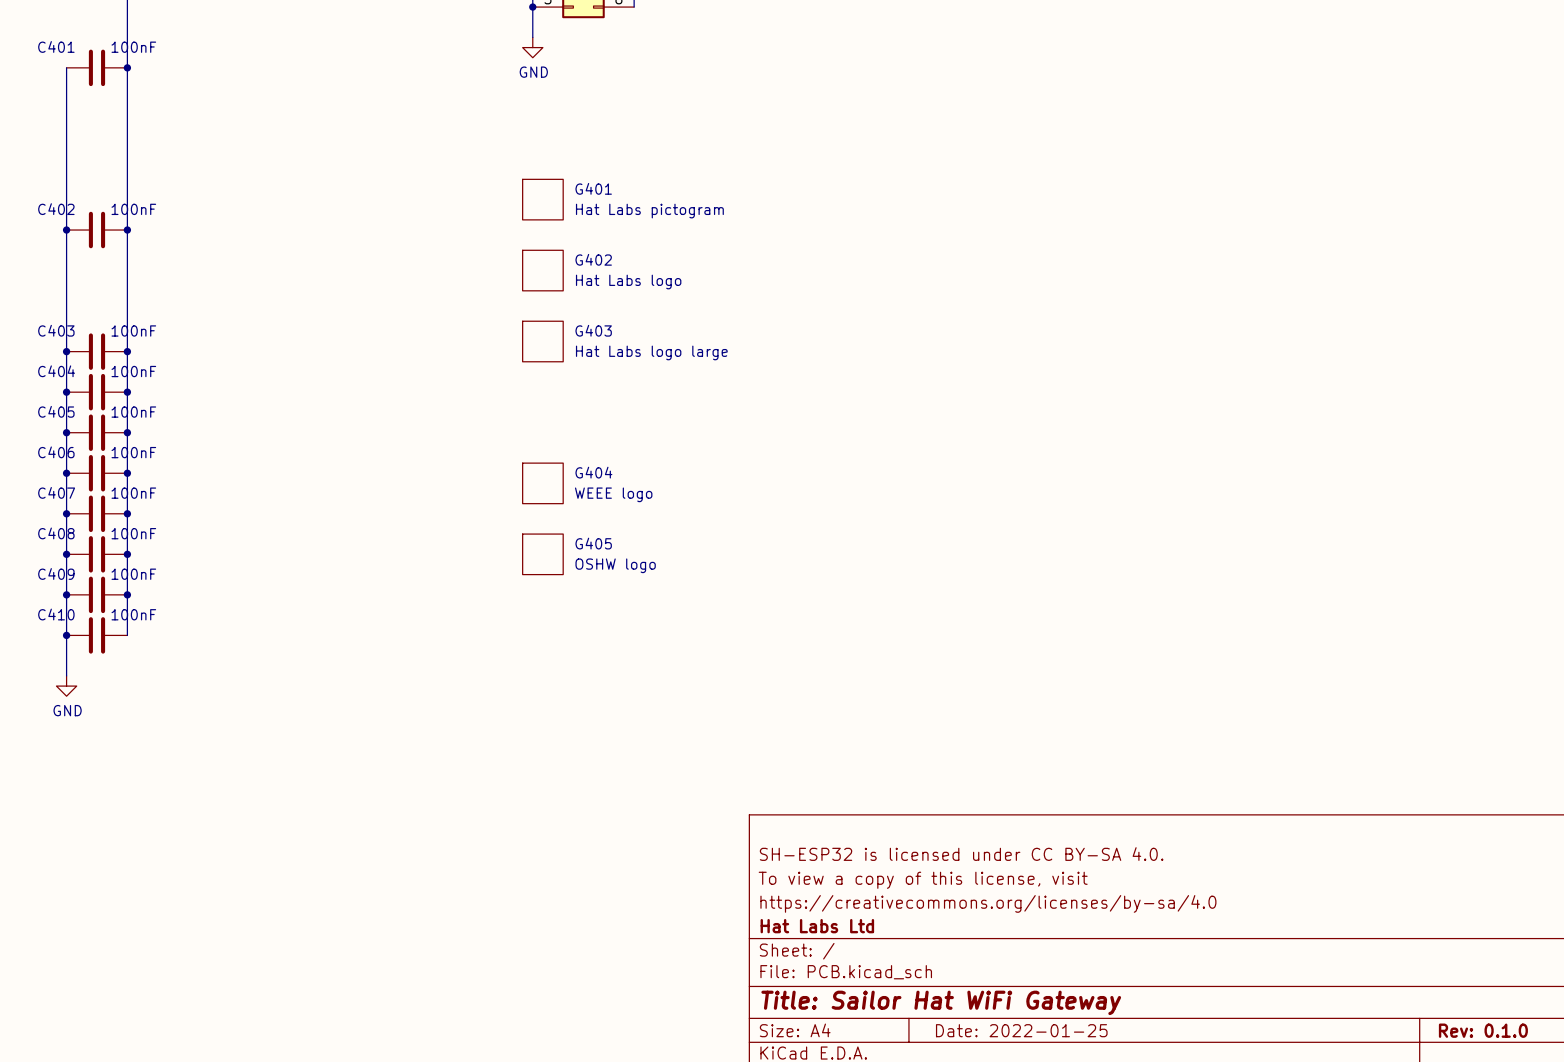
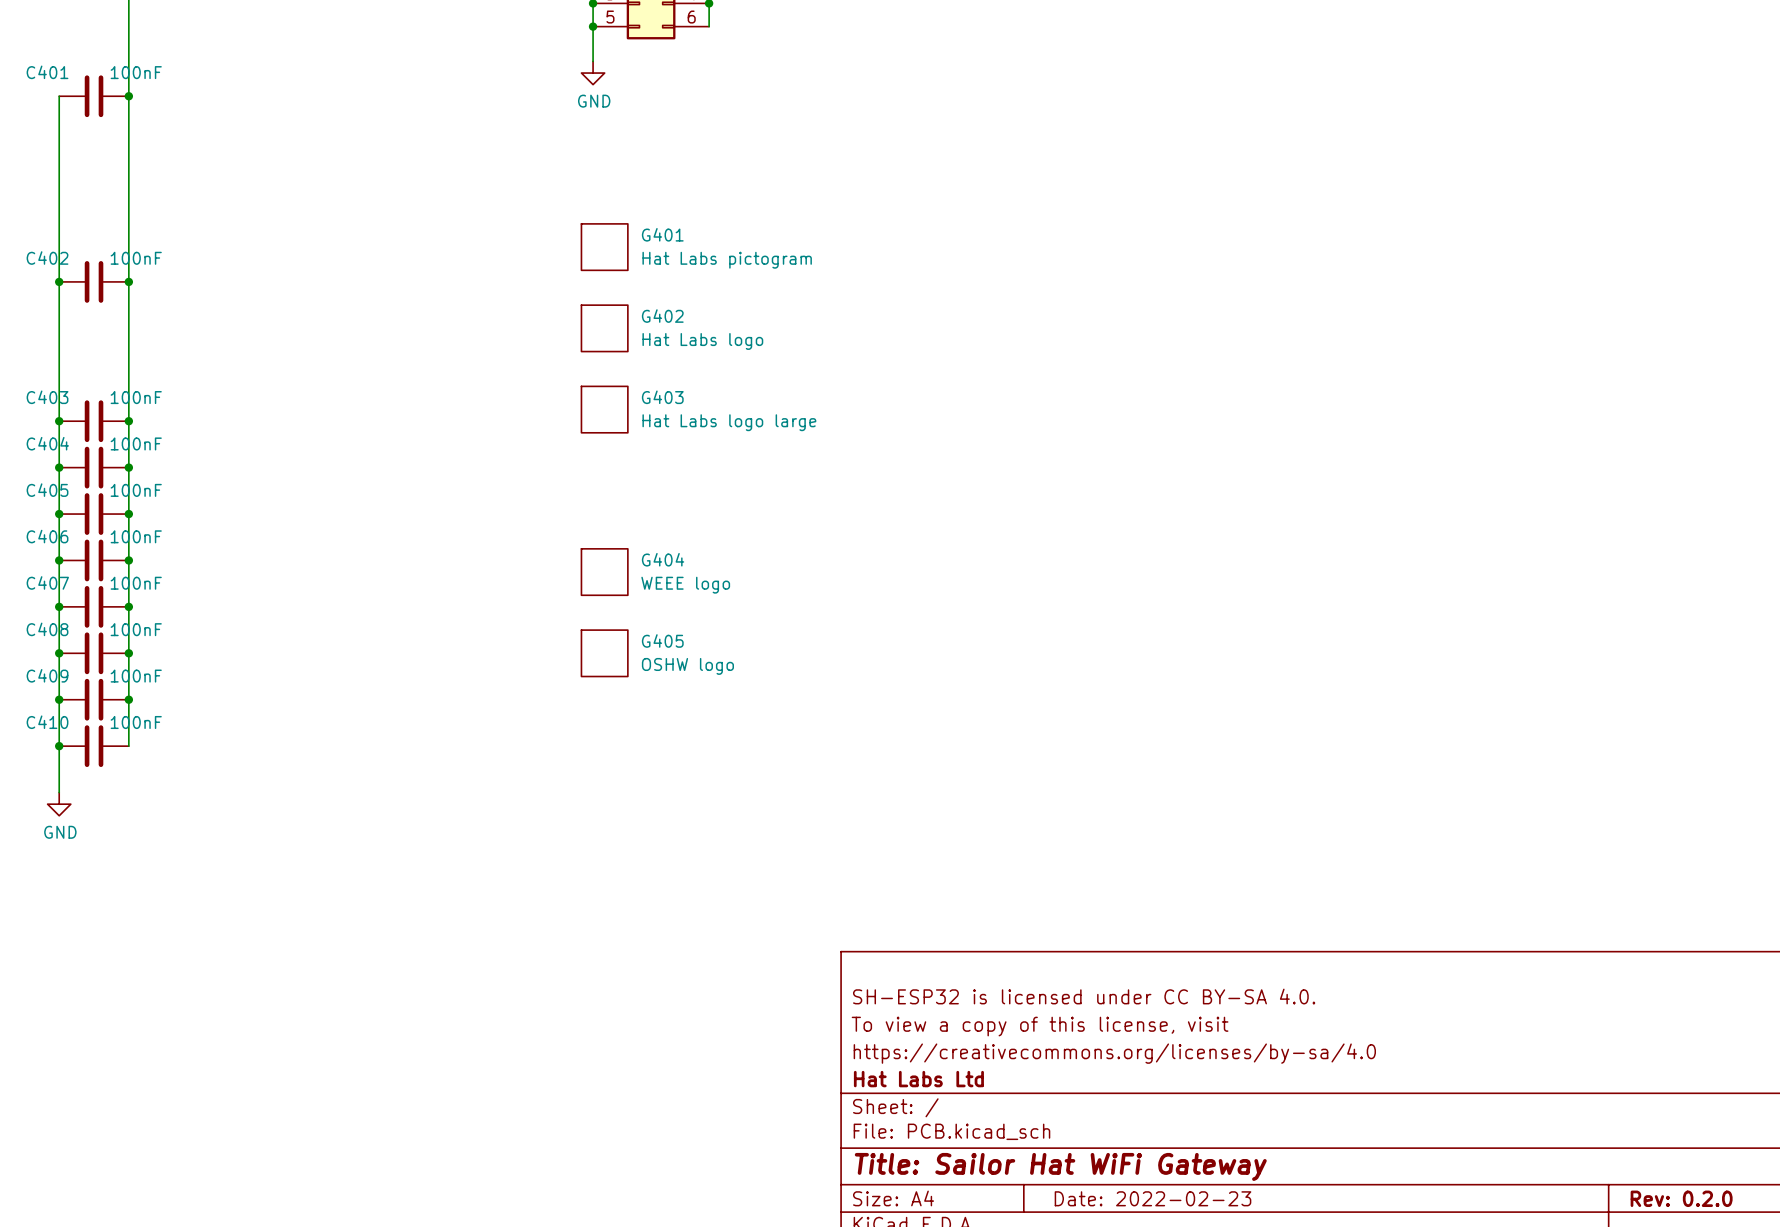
title block: Date: 2022-01-25 (1021, 1030) -> Date: 2022-02-23 (1153, 1198)
title block: Rev: 0.1.0 (1483, 1030) -> Rev: 0.2.0 (1681, 1198)

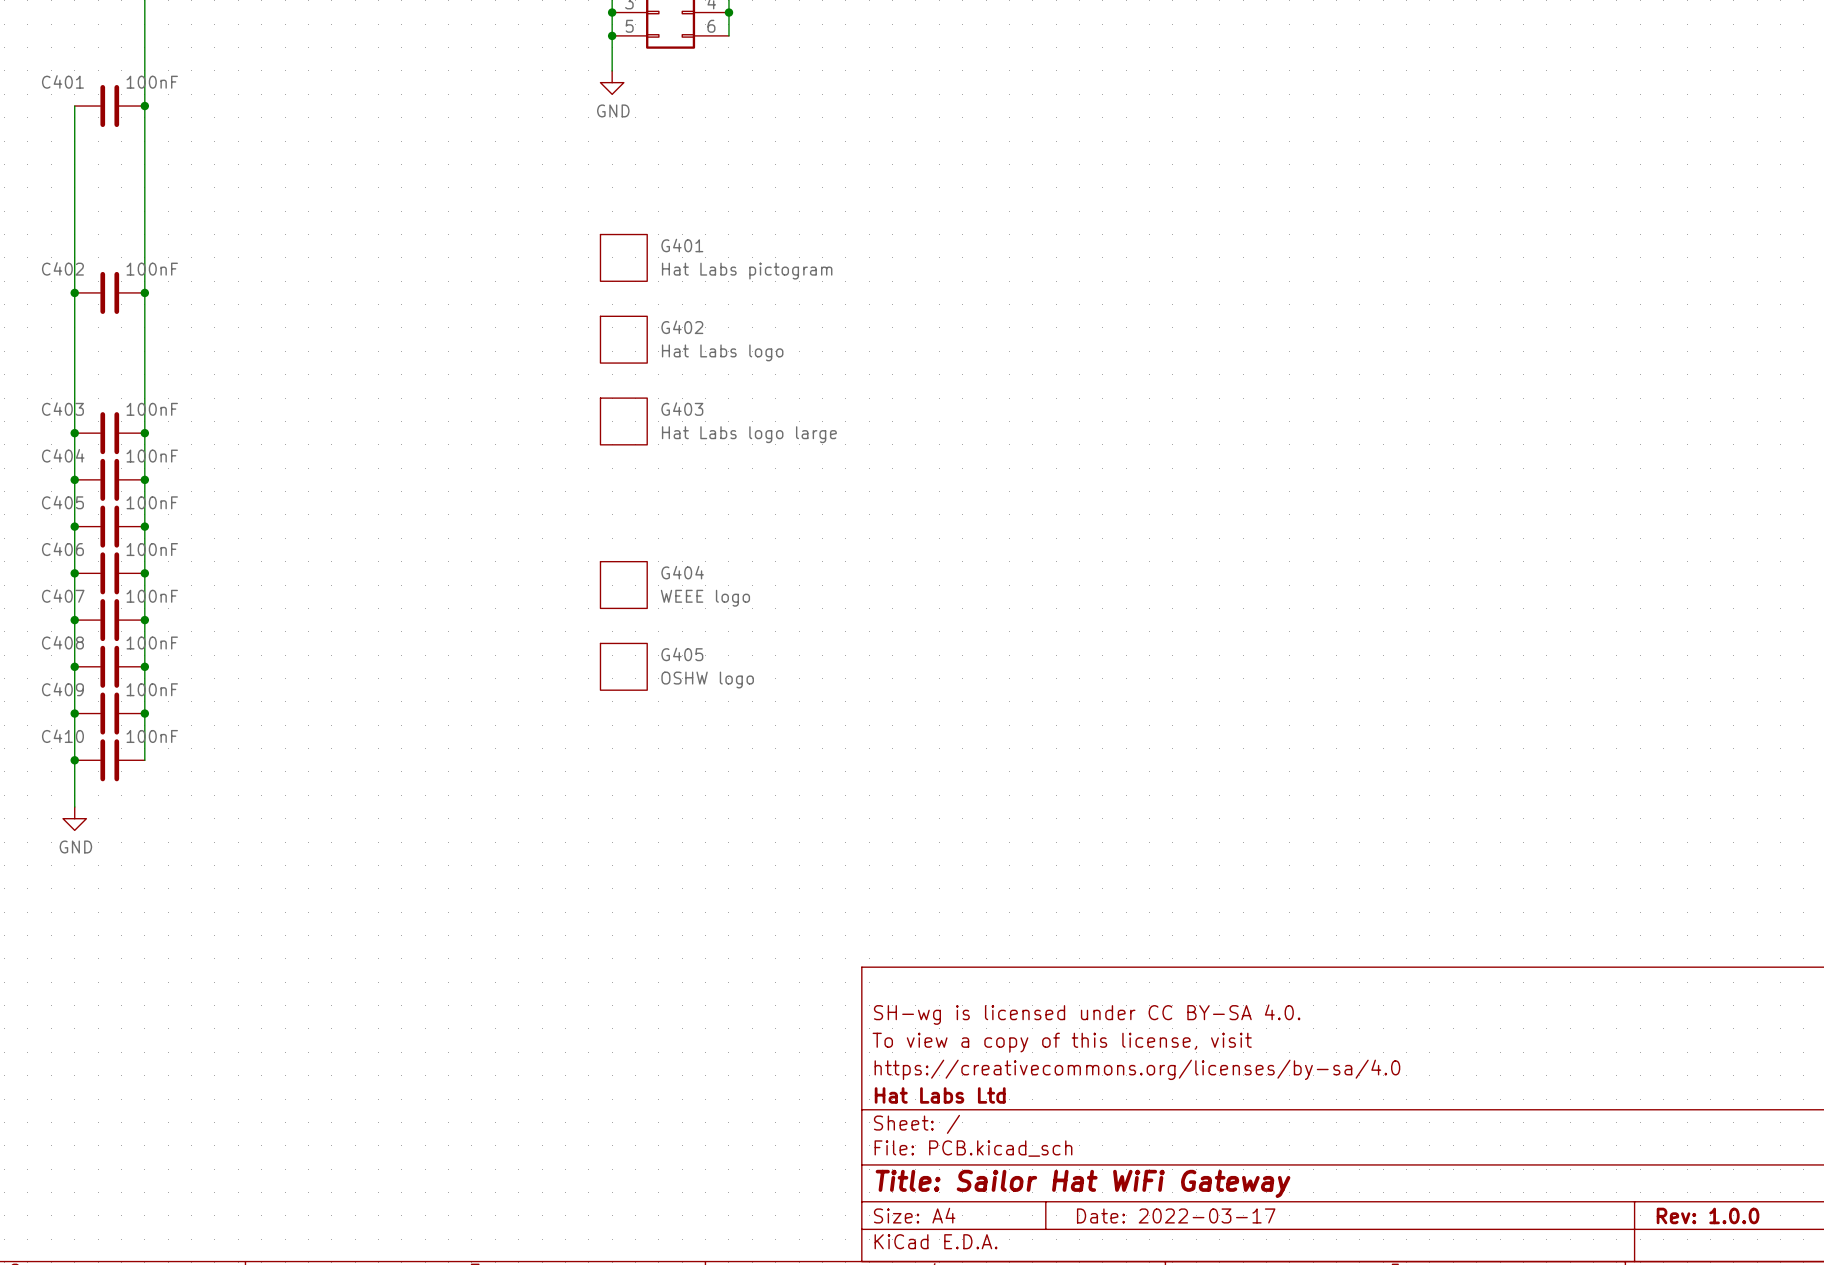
title block: SH-ESP32 is licensed under CC BY-SA 4.0. (1084, 996) -> SH-wg is licensed under CC BY-SA 4.0. (1087, 1014)
title block: Date: 2022-02-23 (1153, 1198) -> Date: 2022-03-17 (1176, 1215)
title block: Rev: 0.2.0 (1681, 1198) -> Rev: 1.0.0 (1708, 1215)

